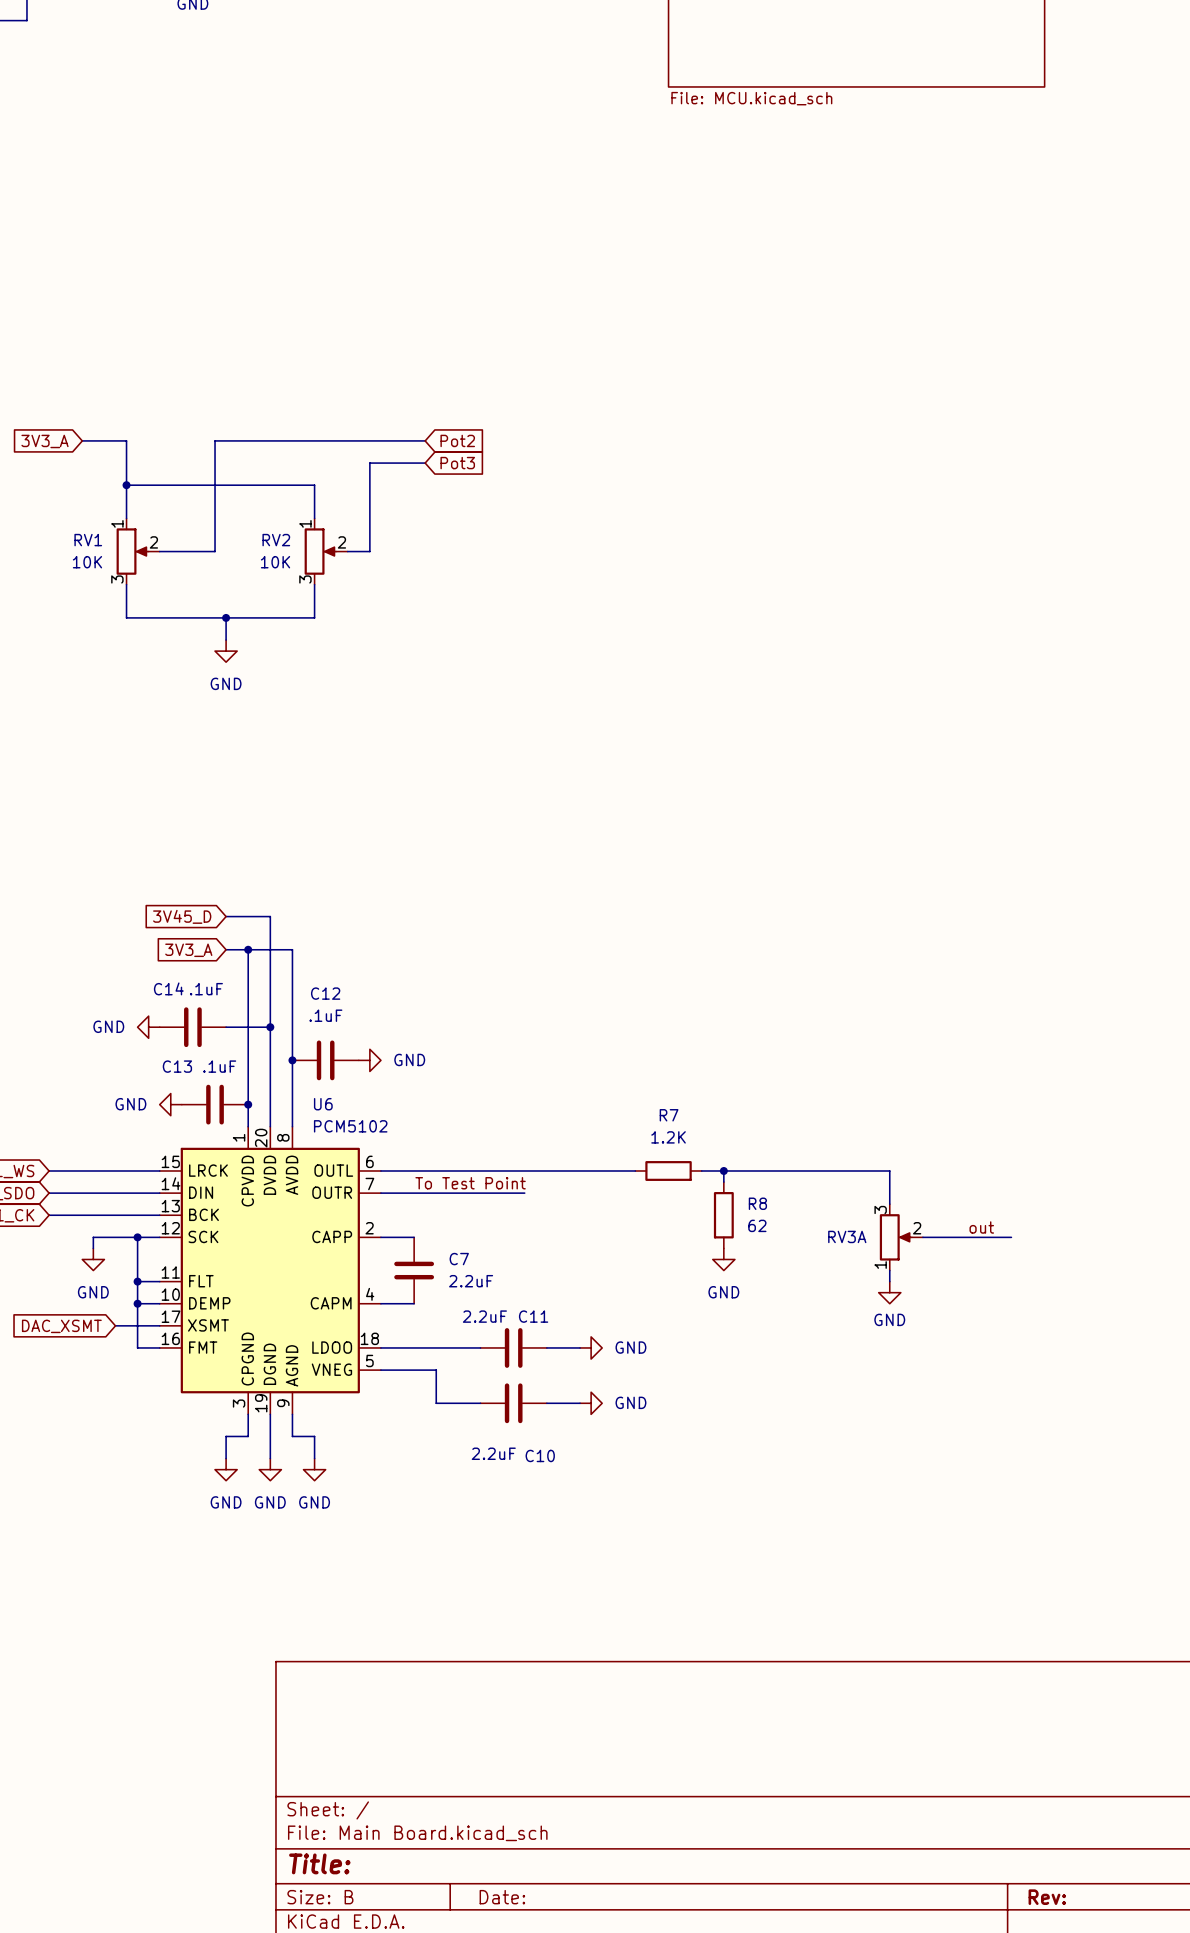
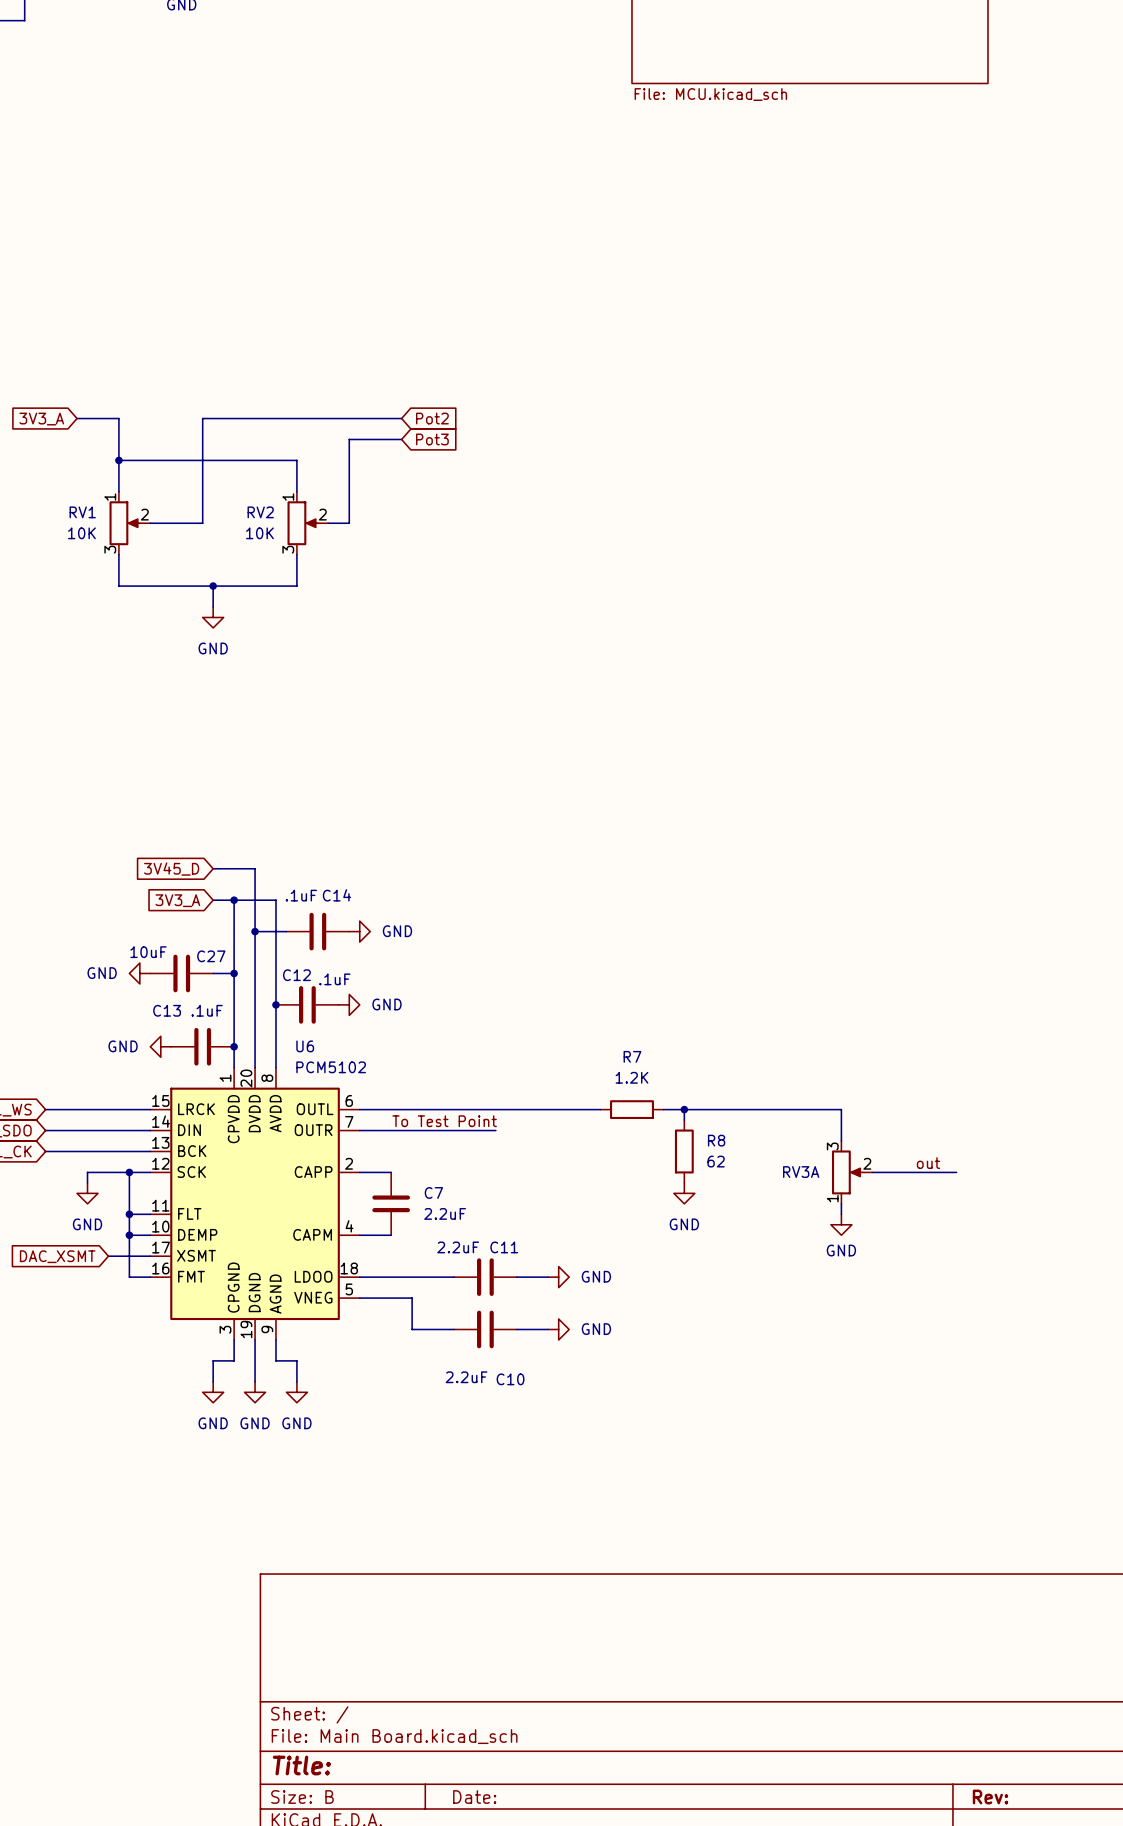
wire: none -> (255, 931) (286, 931)
junction: none -> (255, 931)
C14: none -> .1uF (317, 931)
power symbol: none -> GND (359, 931)
C14 name: C14 (168, 988) -> C27 (211, 956)
C14 value: .1uF (206, 989) -> 10uF (148, 952)
C12 name position: C12 (325, 993) -> C12 (296, 975)
C12 value position: .1uF (325, 1015) -> .1uF (334, 979)
wire: (248, 1027) (270, 1027) -> none
junction: none -> (234, 973)
junction: (270, 1027) -> none

